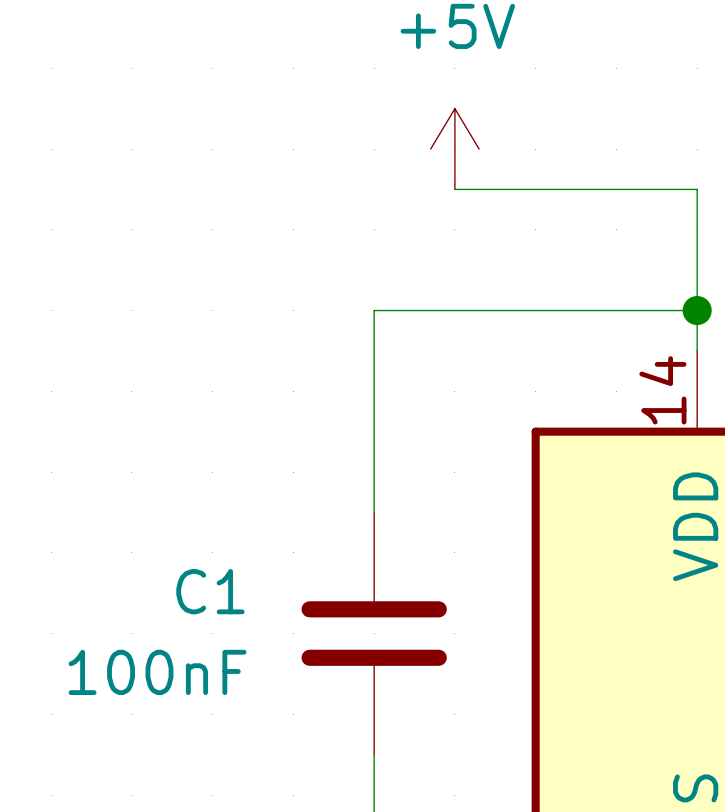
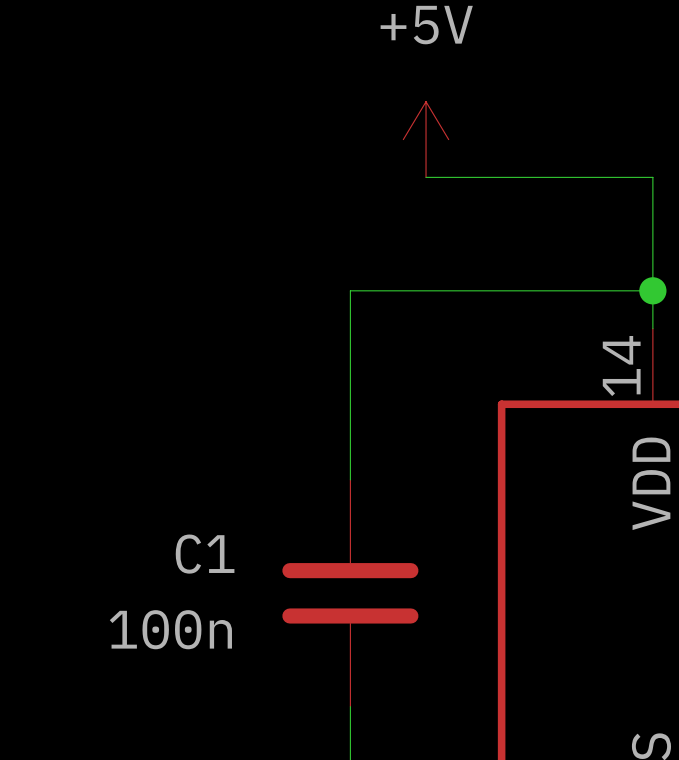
C1 value: 100nF (157, 672) -> 100n (170, 629)

